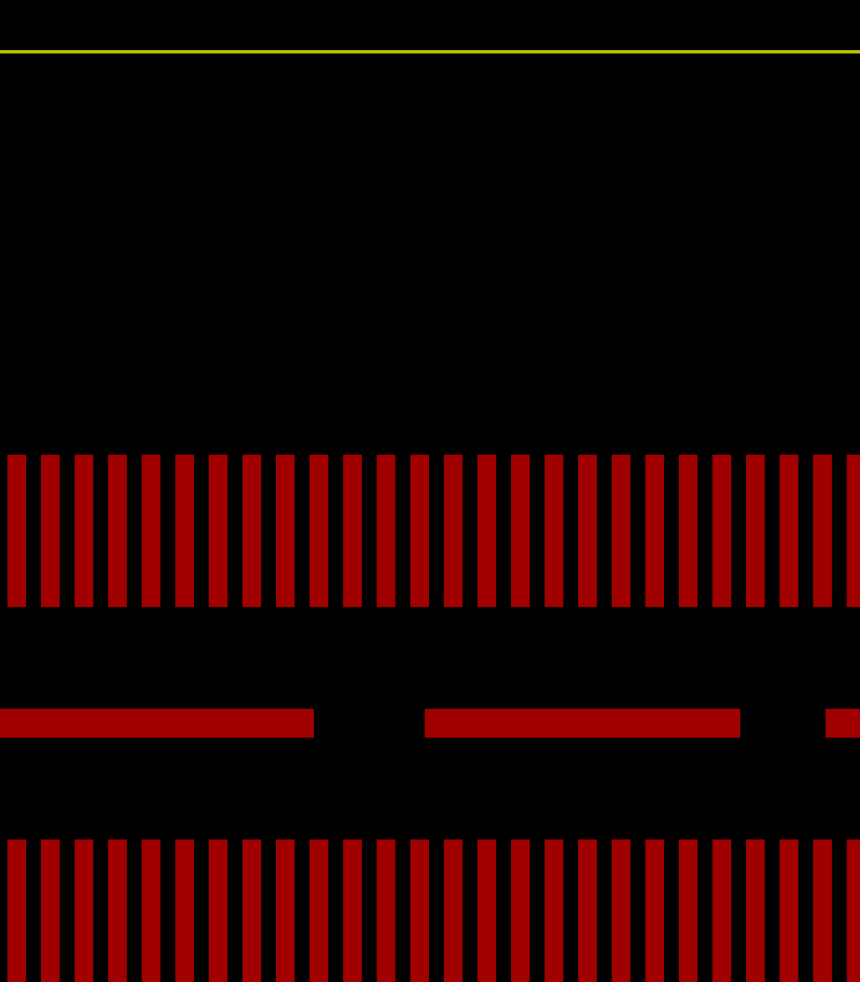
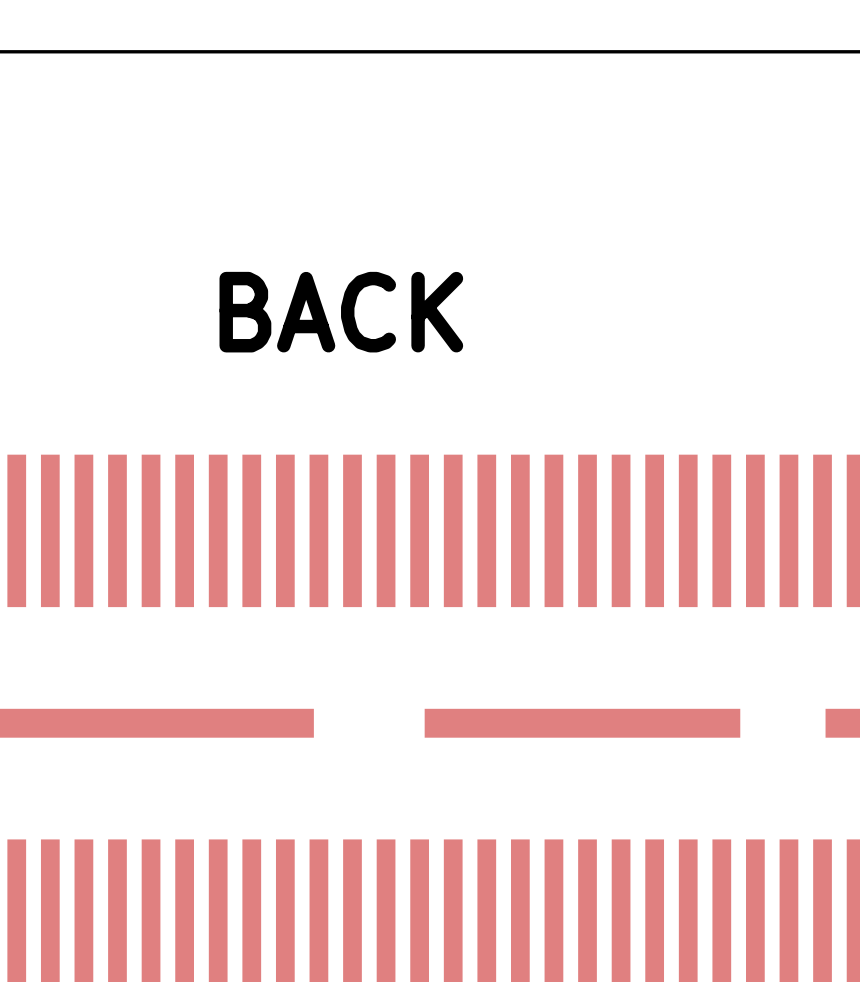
text: none -> BACK (341, 312)

